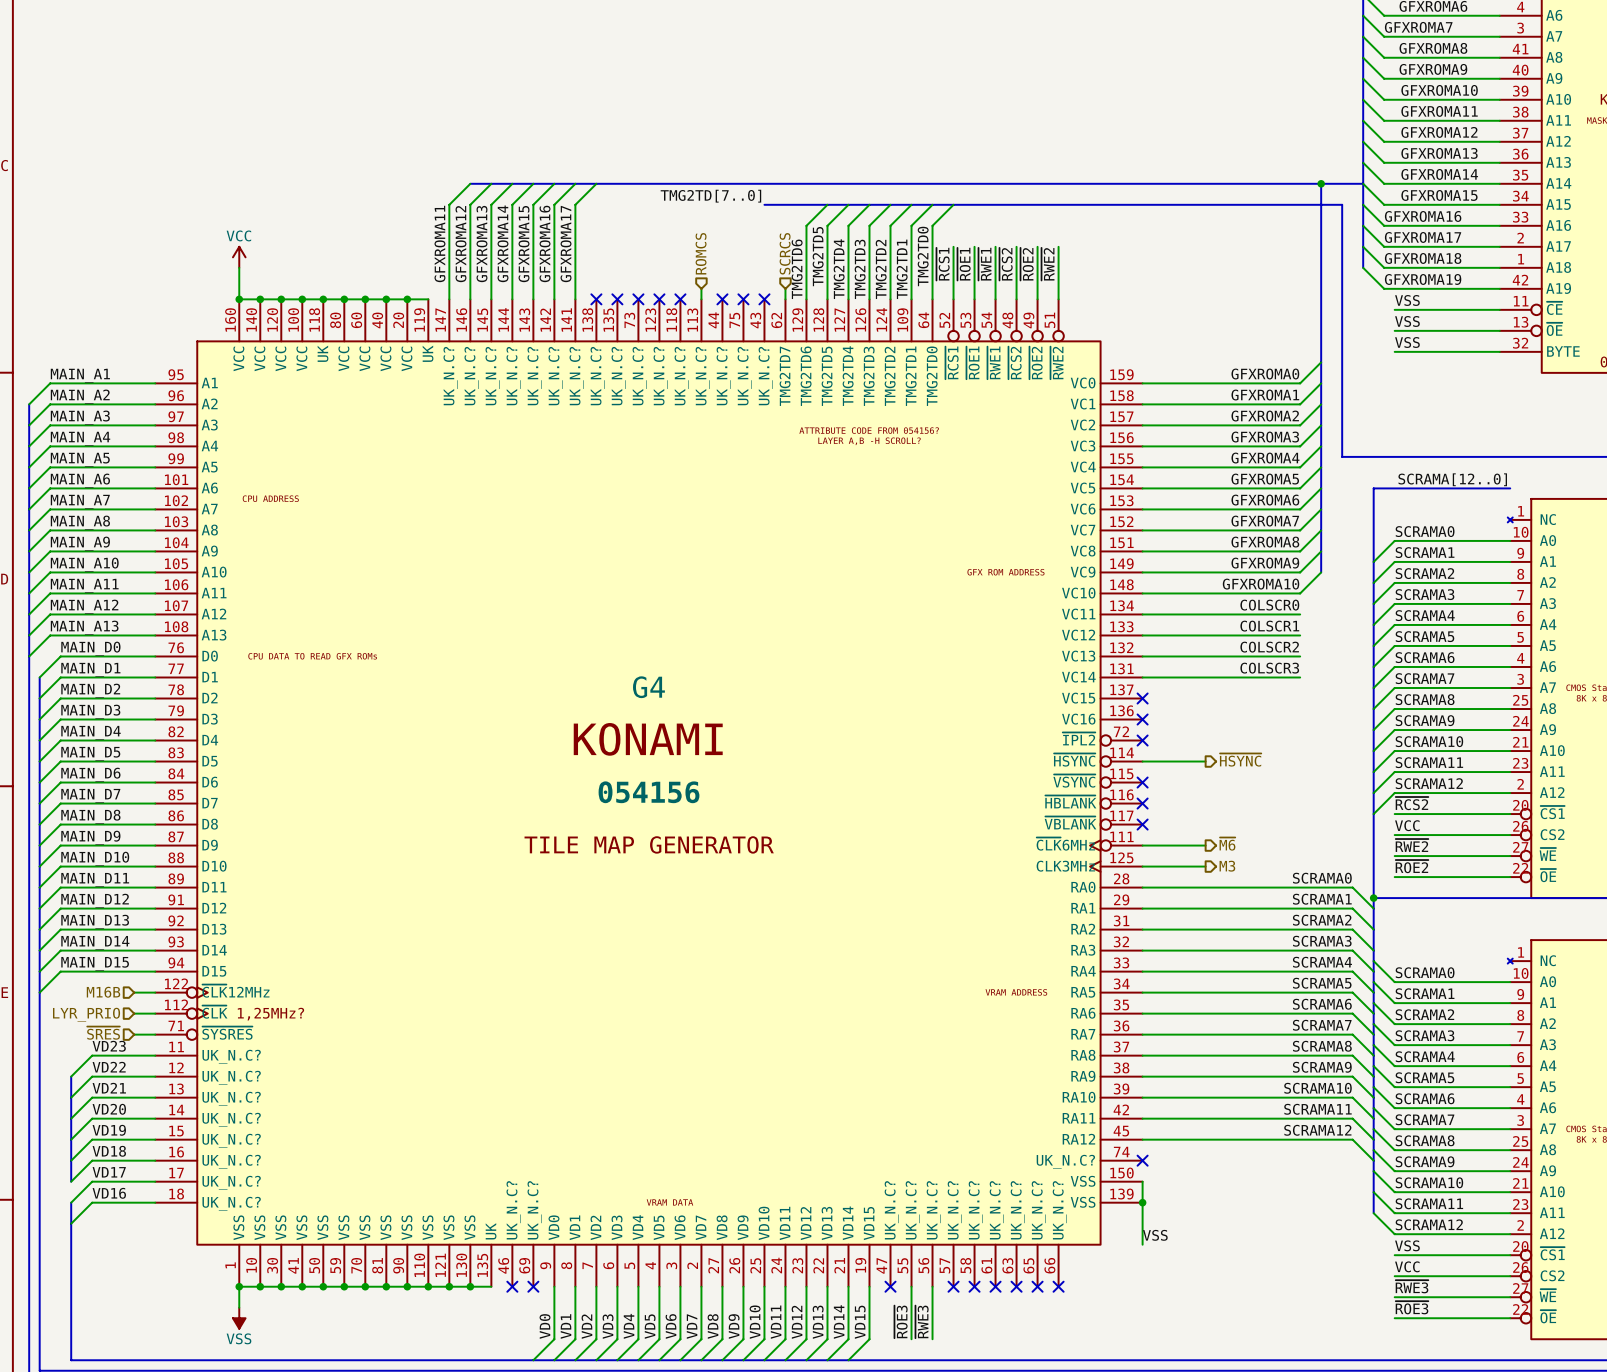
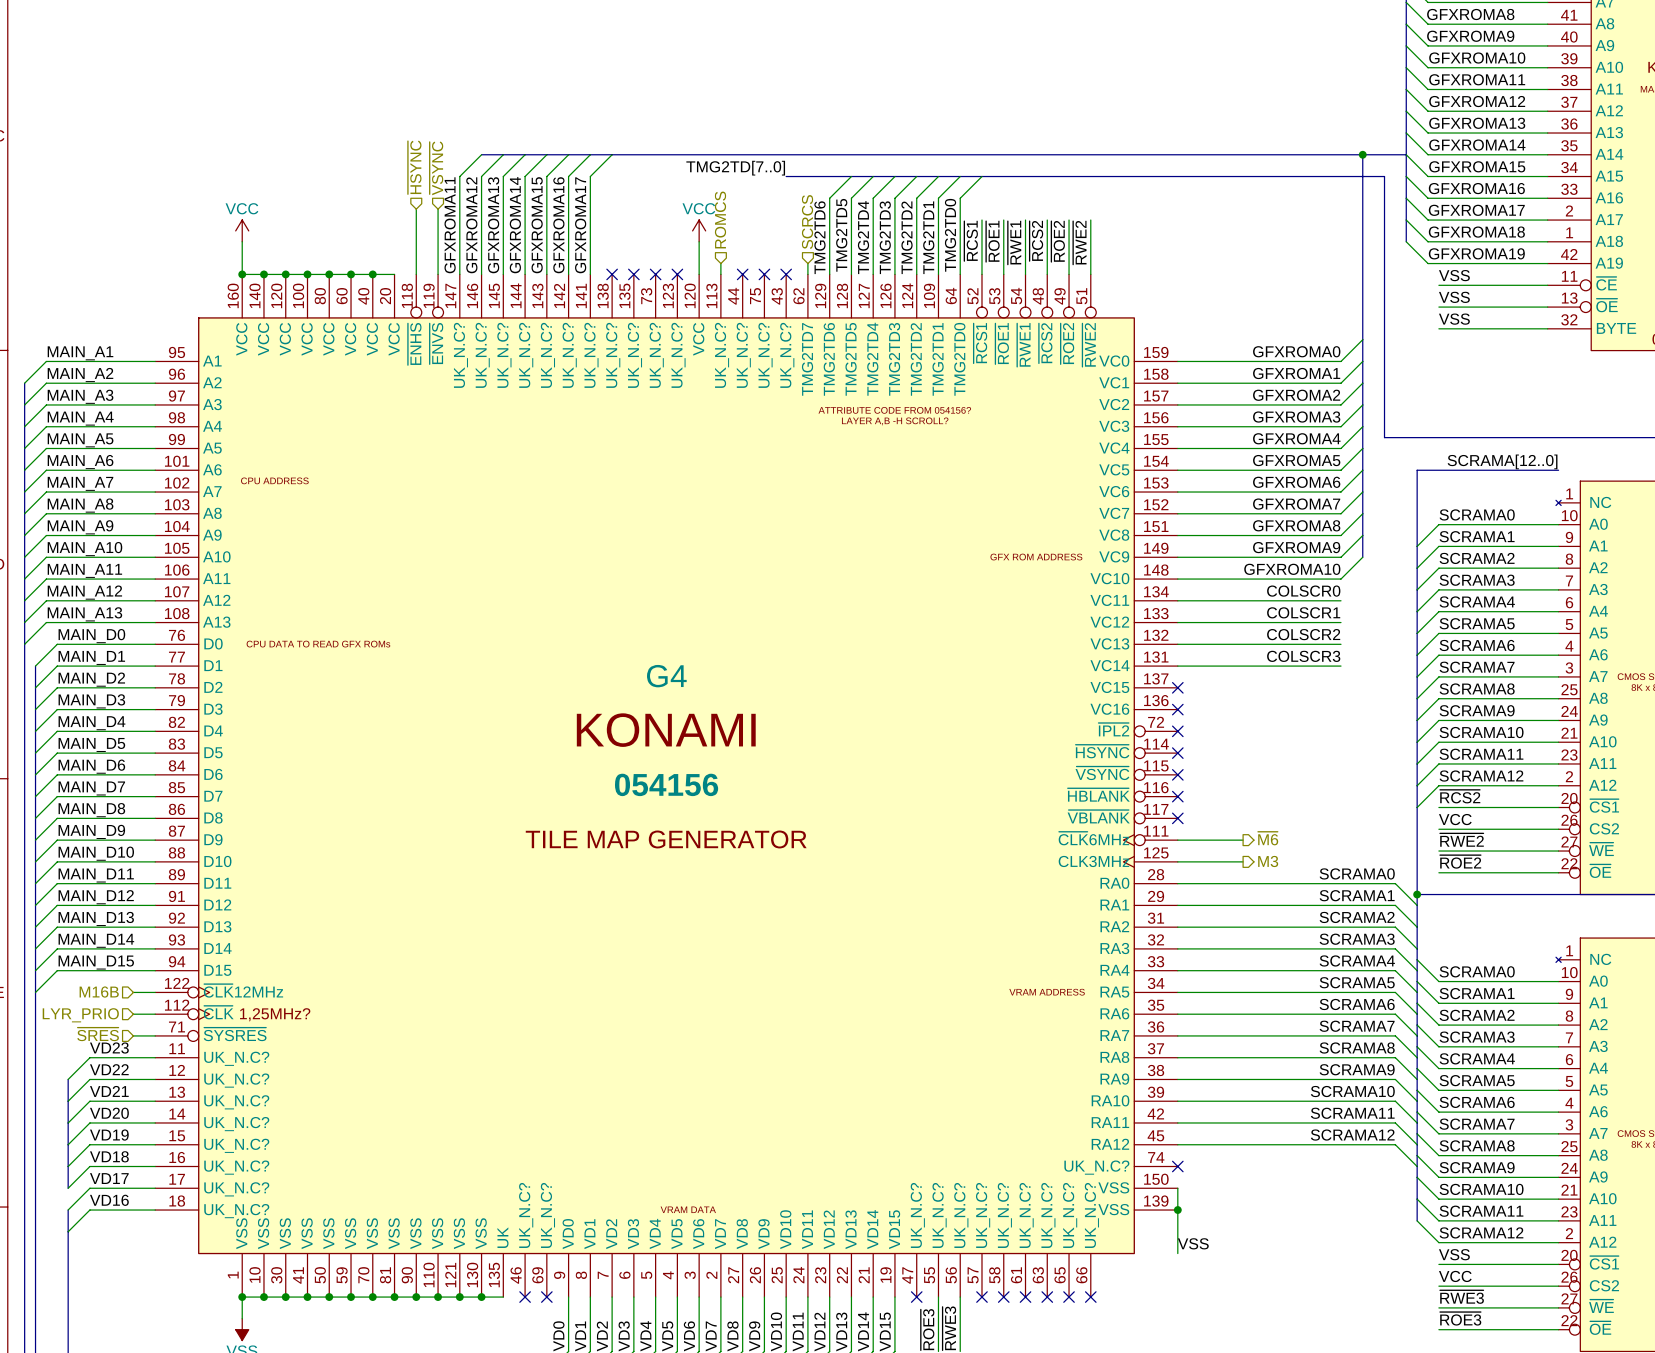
hierarchical label: none -> ~{HSYNC} (414, 167)
hierarchical label: none -> ~{VSYNC} (436, 168)
wire: none -> (416, 209) (416, 274)
power symbol: none -> VCC (699, 230)
wire: none -> (699, 241) (699, 274)
G4 symbol: [155, 299, 1143, 1287] -> [155, 274, 1178, 1298]
wire: (386, 299) (428, 299) -> (438, 209) (438, 274)
junction: (386, 299) -> none
junction: (407, 299) -> none
no-connect mark: (680, 299) -> none
hierarchical label: ~{HSYNC} (1240, 760) -> none
wire: (1142, 761) (1205, 761) -> none
no-connect mark: none -> (1177, 753)

